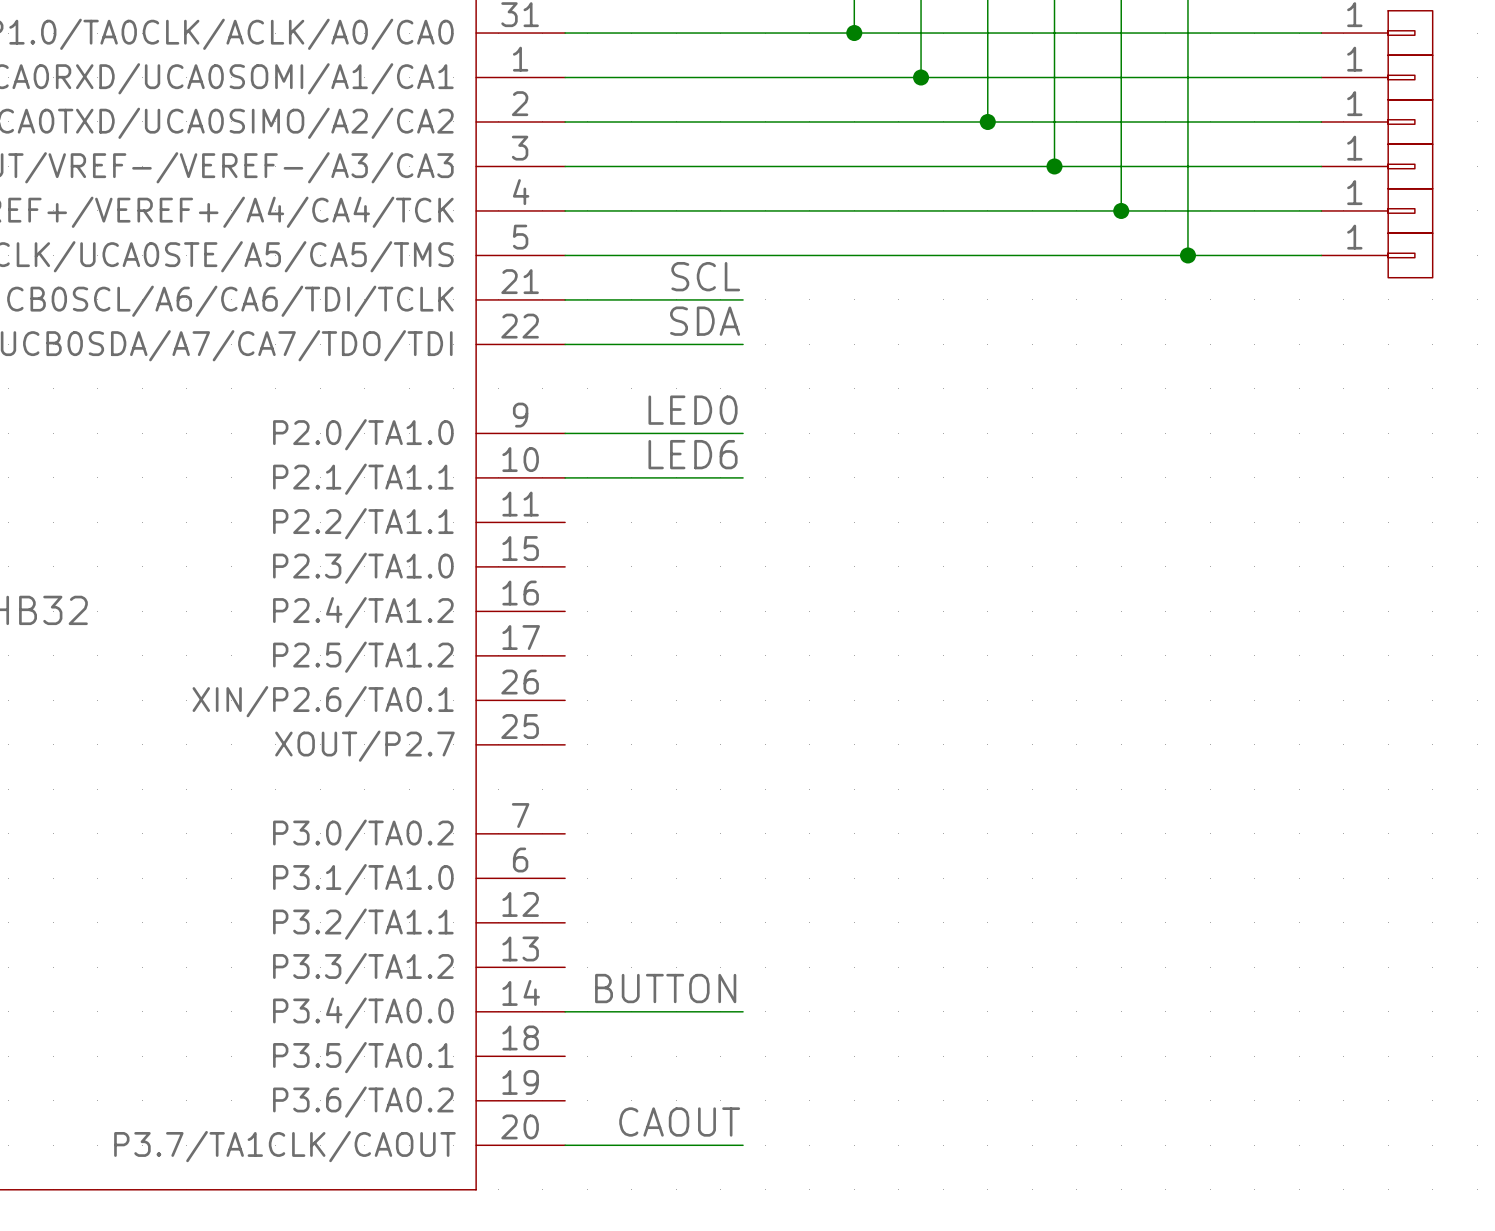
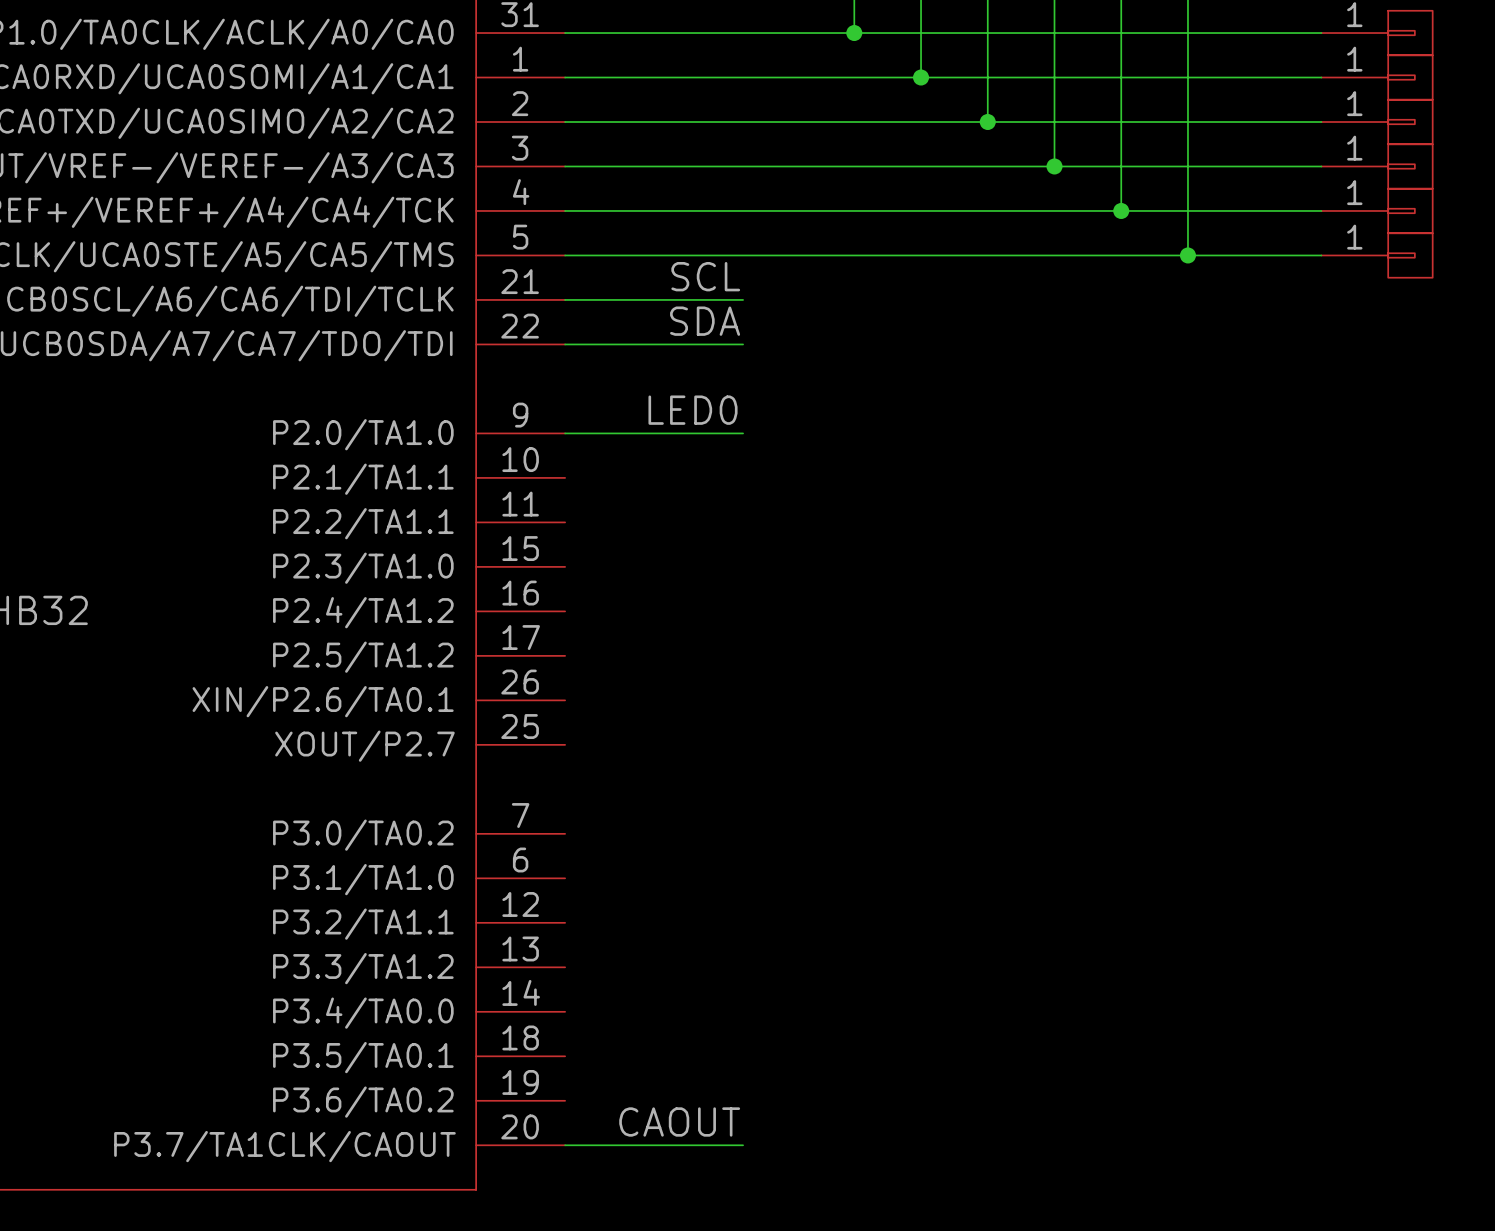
label: LED6 (693, 454) -> none
wire: (565, 477) (743, 477) -> none
label: BUTTON (665, 988) -> none
wire: (565, 1011) (743, 1011) -> none

